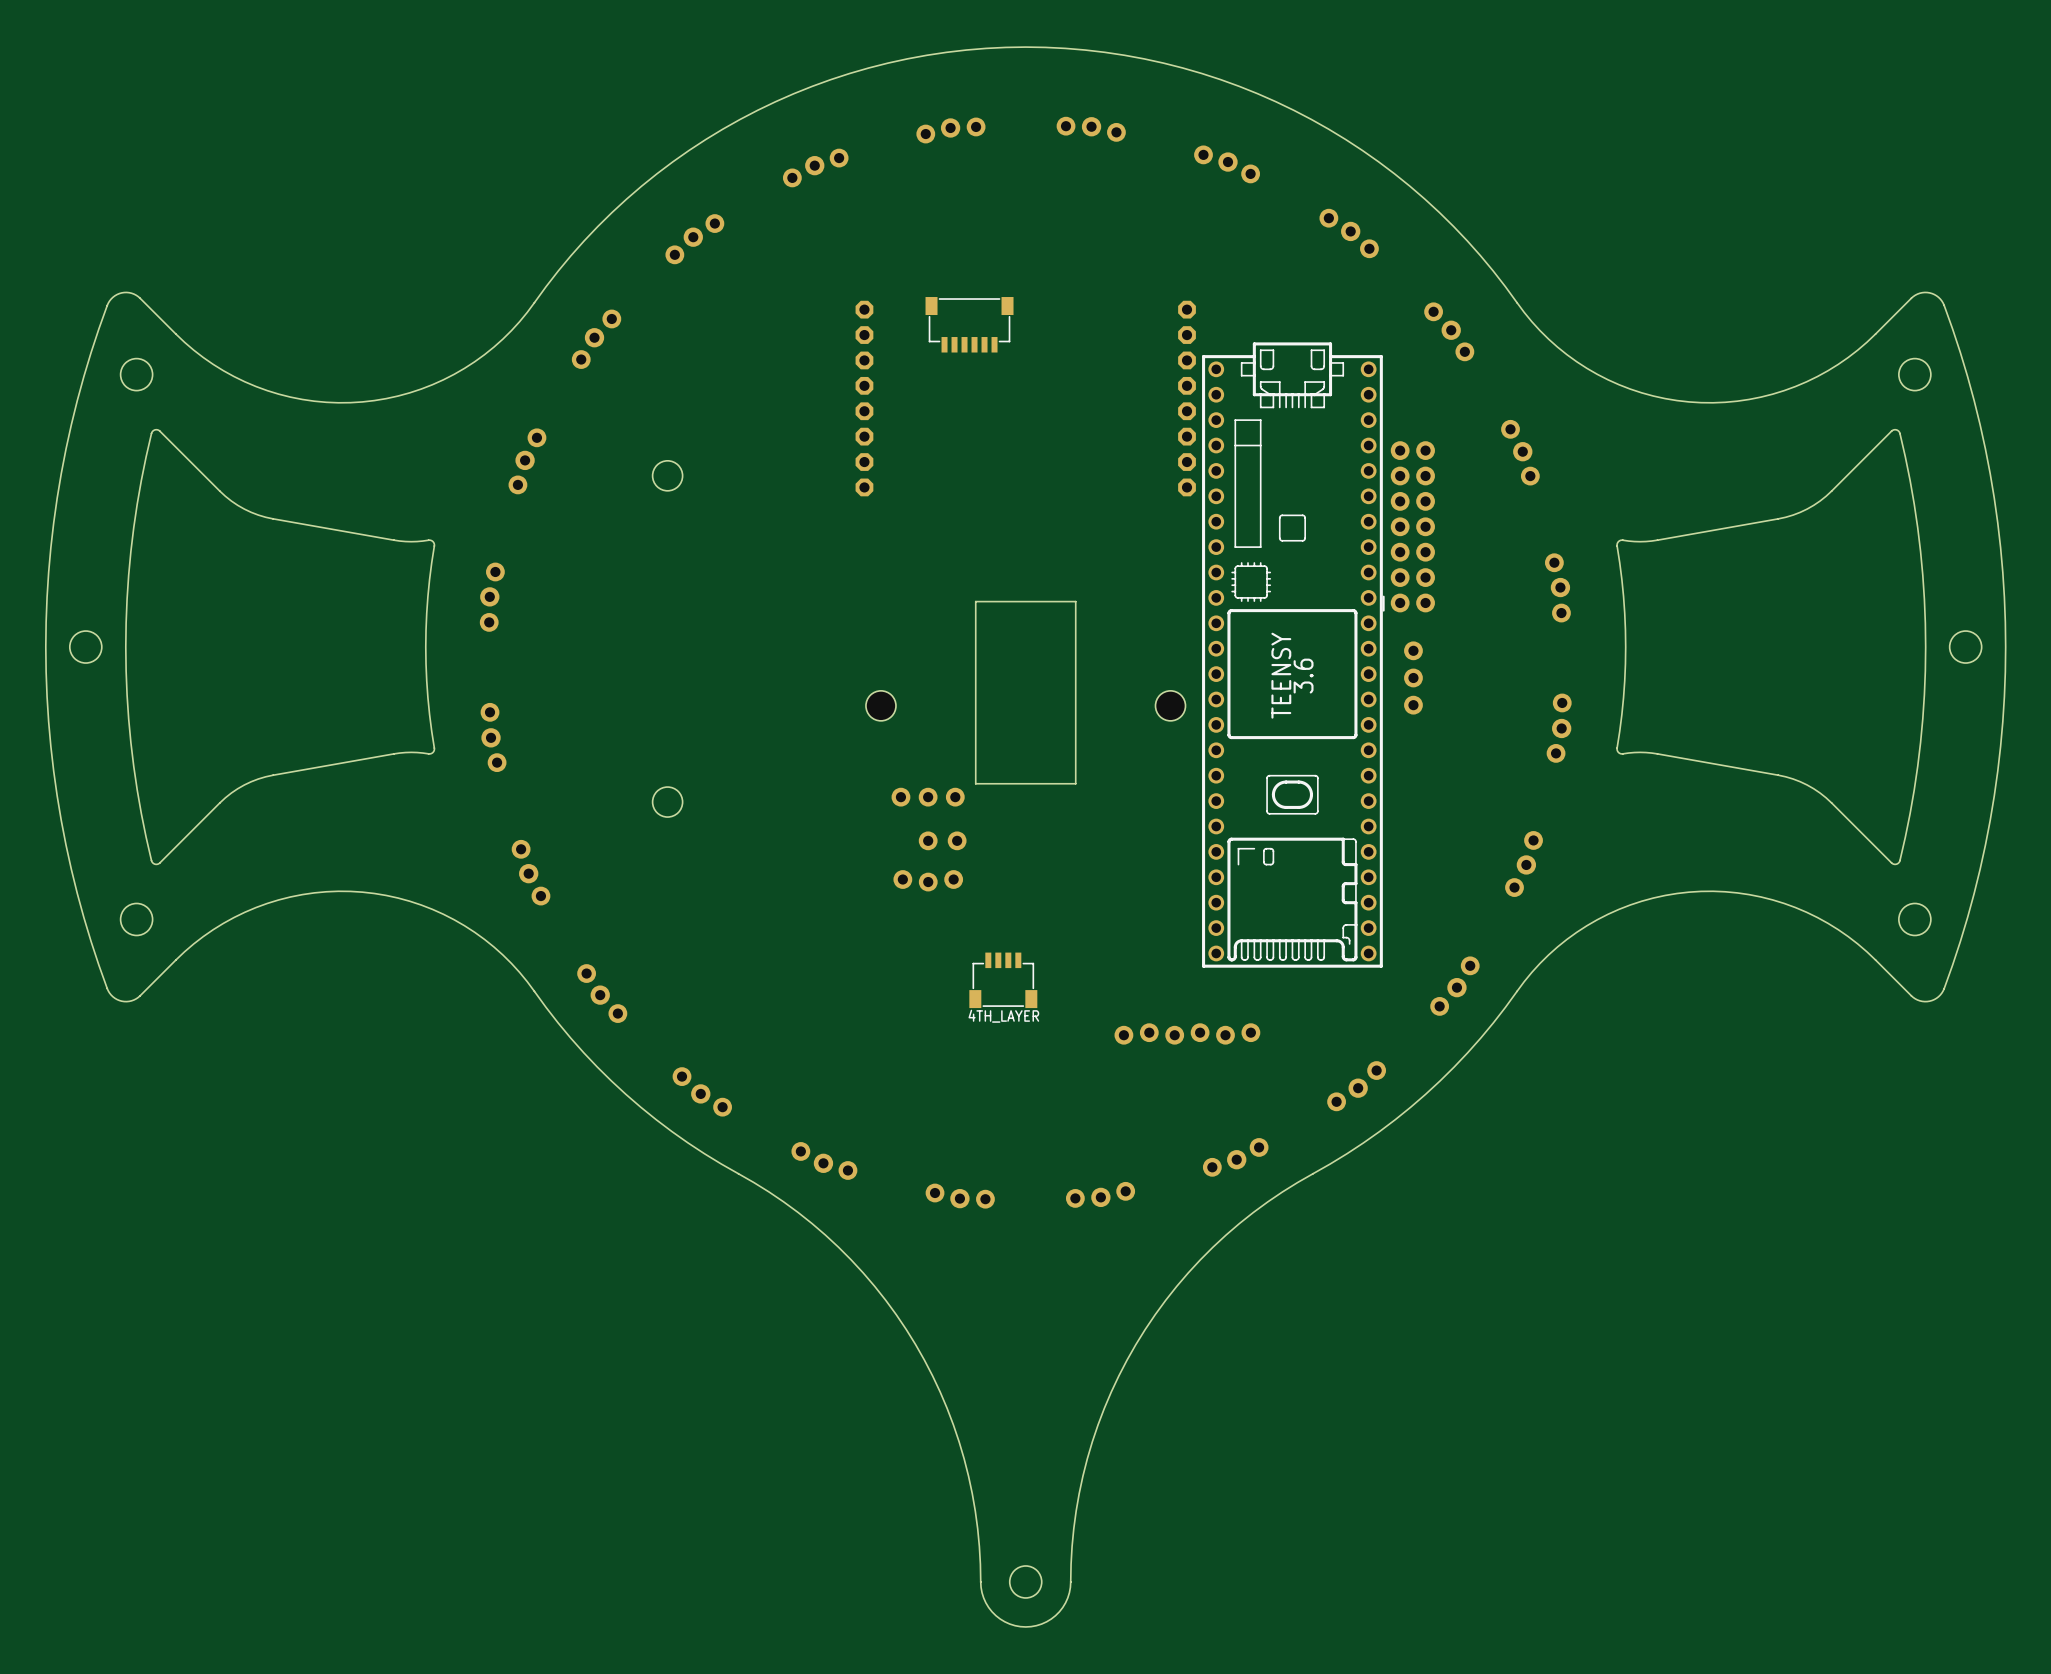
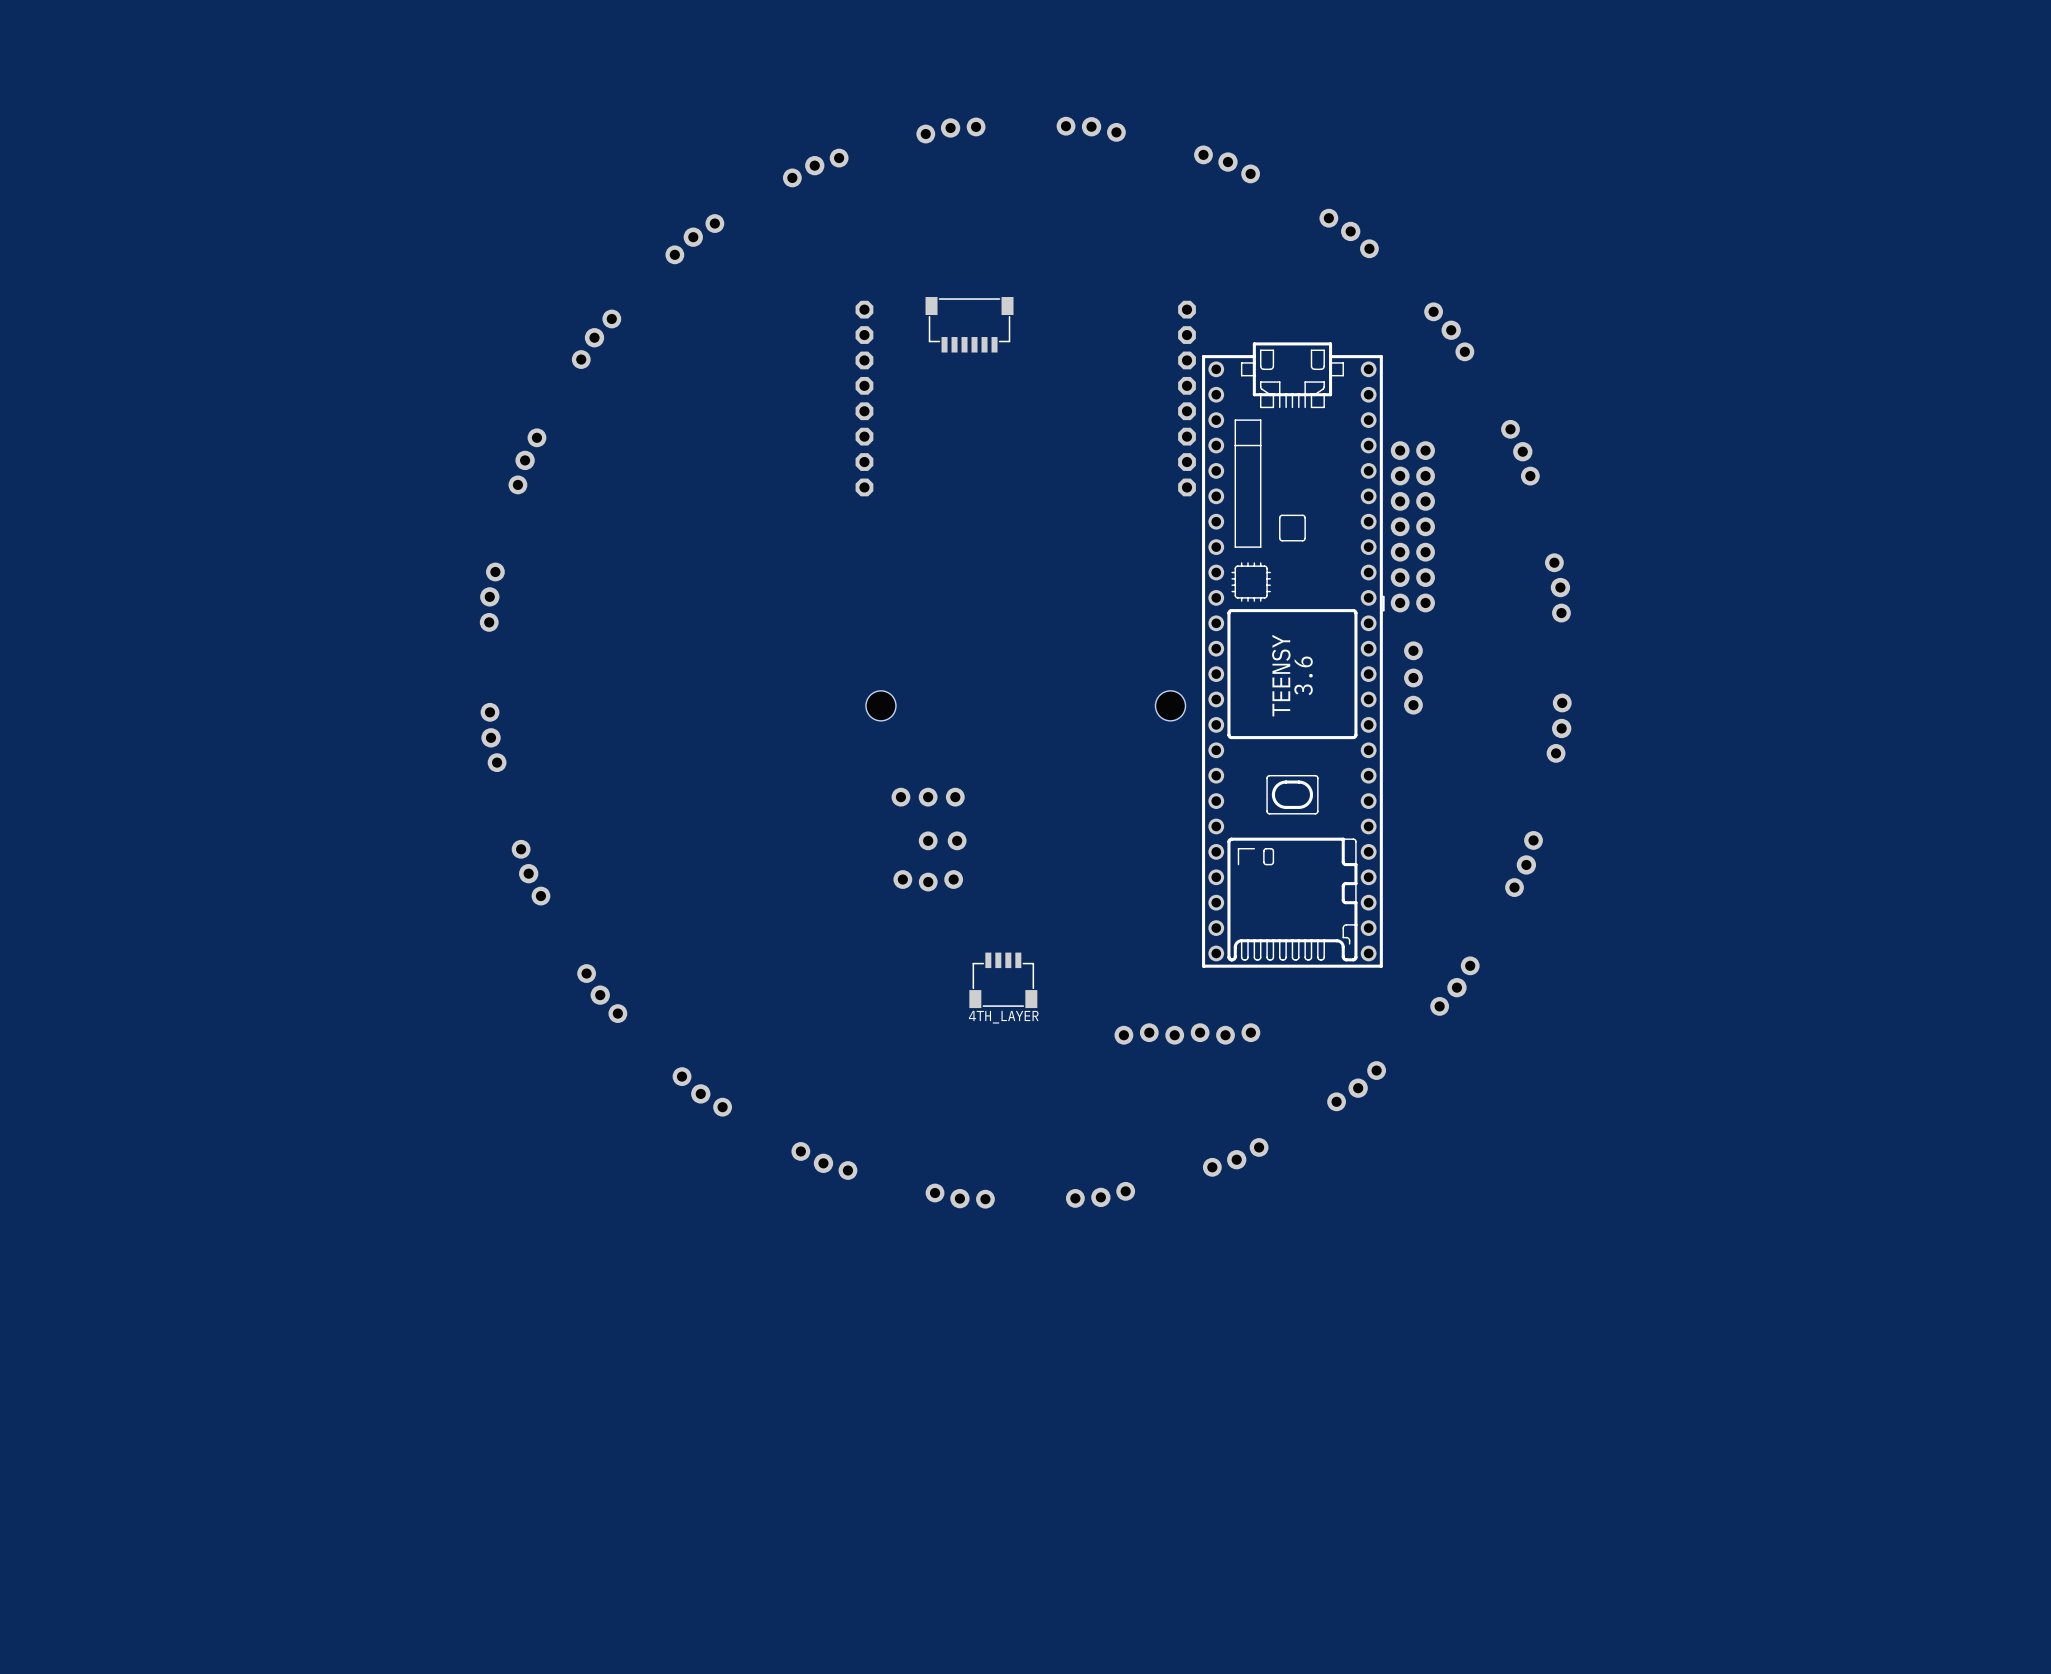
round board edge: [120, 358, 153, 391] -> none
round board edge: [1898, 358, 1931, 391] -> none
board edge: (159, 431) (225, 496) (251, 512) (273, 518) (394, 540) (411, 541) (429, 540) (433, 542) (427, 596) (425, 647) (427, 697) (434, 748) (430, 753) (394, 753) (273, 775) (251, 781) (225, 797) (159, 862) (156, 864) (151, 861) (146, 837) (133, 766) (127, 694) (125, 647) (128, 575) (137, 503) (151, 432) (155, 429) (159, 431) -> none
board edge: (1891, 431) (1826, 496) (1800, 512) (1778, 518) (1657, 540) (1640, 541) (1621, 540) (1618, 542) (1623, 596) (1625, 647) (1623, 697) (1617, 748) (1621, 753) (1657, 753) (1778, 775) (1800, 781) (1826, 797) (1891, 862) (1895, 864) (1899, 861) (1905, 837) (1917, 766) (1924, 694) (1925, 647) (1922, 575) (1914, 503) (1899, 432) (1896, 429) (1891, 431) -> none
round board edge: [652, 460, 683, 491] -> none
board edge: (1075, 601) (975, 601) (975, 783) (1075, 783) (1075, 601) -> none
round board edge: [69, 631, 102, 664] -> none
round board edge: [1949, 631, 1982, 664] -> none
round board edge: [652, 787, 683, 818] -> none
round board edge: [120, 903, 153, 936] -> none
round board edge: [1898, 903, 1931, 936] -> none
round board edge: [1009, 1565, 1042, 1598] -> none
board edge: (1070, 1581) (1076, 1511) (1092, 1441) (1111, 1391) (1127, 1360) (1165, 1300) (1212, 1247) (1253, 1212) (1282, 1191) (1363, 1142) (1425, 1094) (1480, 1038) (1540, 963) (1576, 932) (1608, 914) (1653, 898) (1701, 891) (1749, 894) (1795, 907) (1838, 929) (1866, 951) (1917, 999) (1929, 1001) (1941, 993) (1967, 917) (1990, 820) (2000, 746) (2005, 647) (2000, 547) (1985, 449) (1960, 352) (1944, 305) (1936, 295) (1924, 292) (1915, 295) (1866, 342) (1848, 357) (1817, 376) (1784, 390) (1760, 397) (1725, 402) (1689, 401) (1653, 396) (1608, 379) (1586, 368) (1557, 347) (1531, 321) (1480, 255) (1439, 212) (1378, 161) (1311, 119) (1257, 93) (1182, 67) (1104, 52) (1025, 47) (946, 52) (868, 67) (793, 93) (740, 119) (672, 161) (611, 212) (570, 255) (519, 321) (493, 347) (454, 374) (409, 392) (374, 400) (350, 402) (314, 401) (278, 394) (234, 376) (203, 357) (184, 342) (136, 295) (121, 292) (109, 301) (83, 376) (61, 473) (50, 547) (45, 647) (50, 746) (61, 820) (83, 917) (109, 993) (119, 1000) (133, 999) (184, 951) (213, 929) (255, 907) (302, 894) (350, 891) (398, 898) (443, 914) (474, 932) (511, 963) (570, 1038) (625, 1094) (687, 1142) (768, 1191) (798, 1212) (851, 1259) (885, 1300) (924, 1360) (940, 1391) (959, 1441) (975, 1511) (980, 1581) -> none
board edge: (1070, 1581) (1067, 1597) (1055, 1615) (1041, 1624) (1025, 1626) (1009, 1624) (995, 1615) (983, 1597) (980, 1581) -> none

